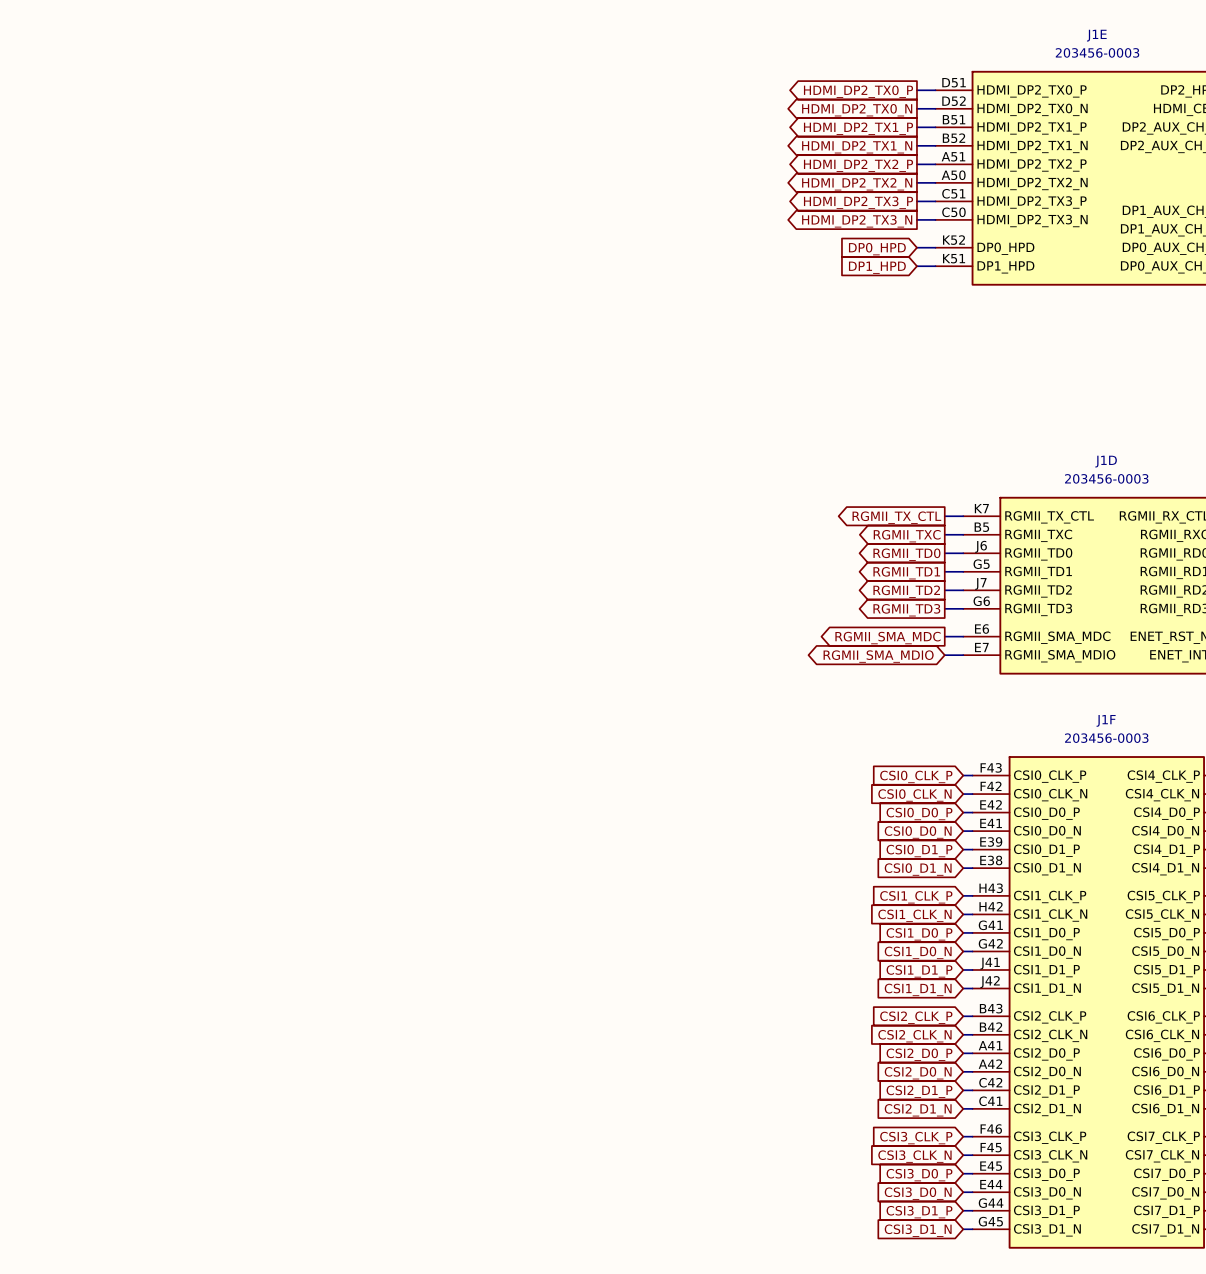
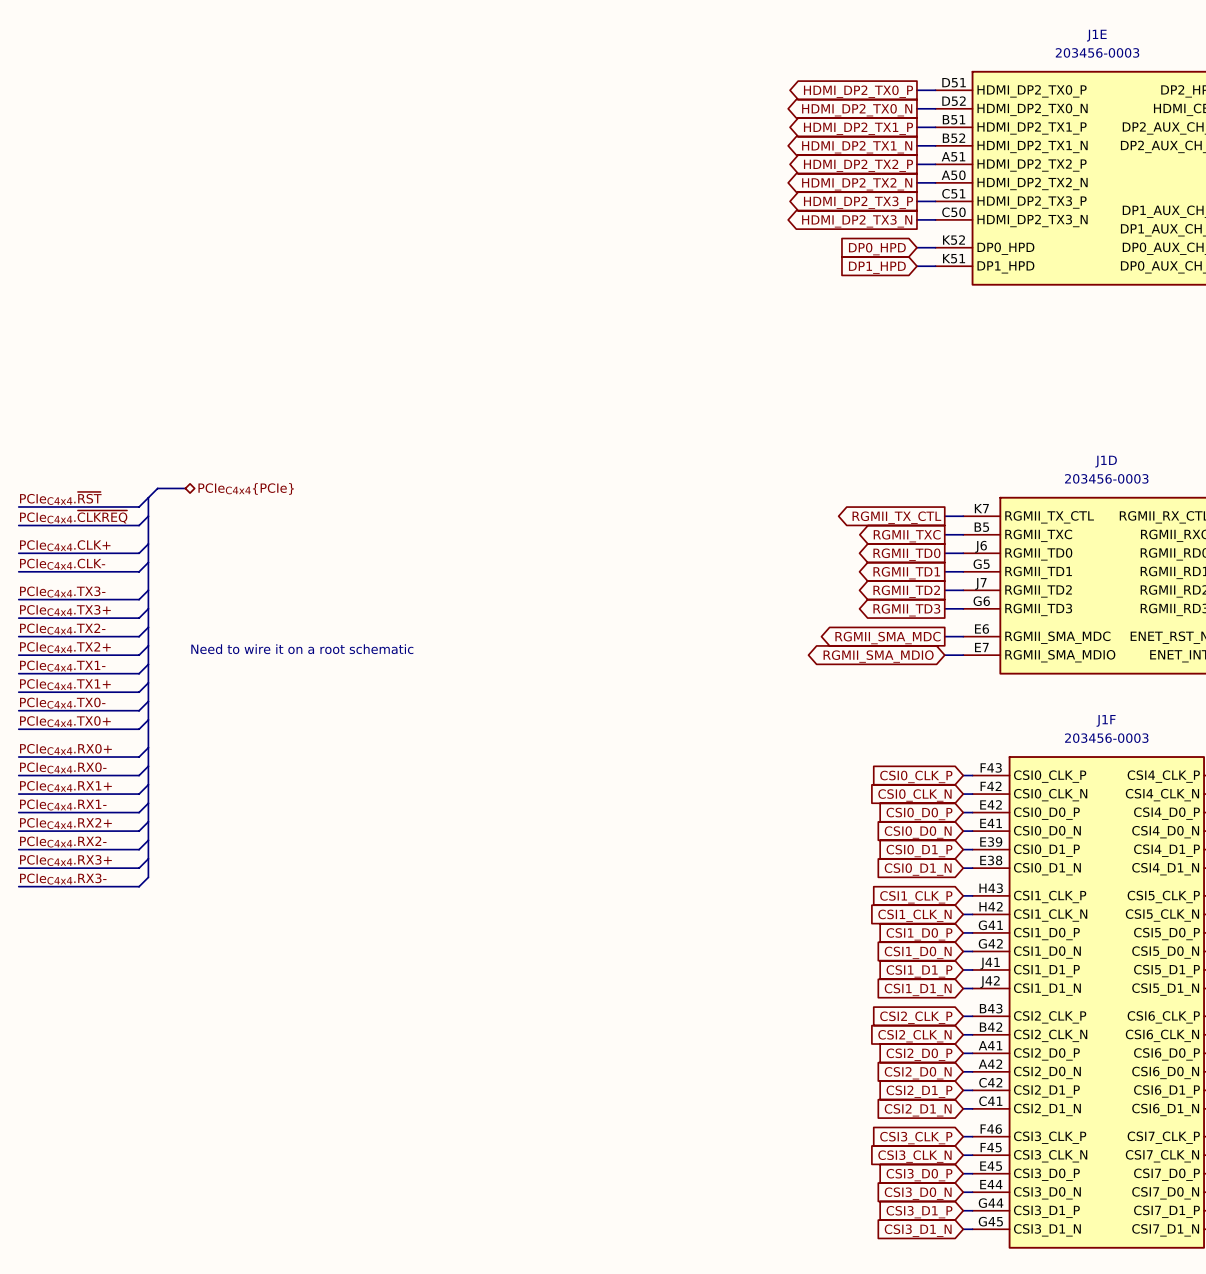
bus: none -> (185, 488) (157, 488) (148, 497) (148, 877)
hierarchical label: none -> PCIeC4x4{PCIe} (246, 488)
wire: none -> (148, 497) (139, 506) (18, 506)
label: none -> PCIeC4x4.~{RST} (60, 498)
wire: none -> (148, 516) (139, 525) (18, 525)
label: none -> PCIeC4x4.~{CLKREQ} (73, 517)
wire: none -> (148, 544) (139, 553) (18, 553)
label: none -> PCIeC4x4.CLK+ (65, 545)
wire: none -> (148, 562) (139, 571) (18, 571)
label: none -> PCIeC4x4.CLK- (62, 564)
wire: none -> (148, 590) (139, 599) (18, 599)
label: none -> PCIeC4x4.TX3- (62, 592)
wire: none -> (148, 608) (139, 618) (18, 618)
label: none -> PCIeC4x4.TX3+ (65, 610)
wire: none -> (148, 627) (139, 636) (18, 636)
label: none -> PCIeC4x4.TX2- (62, 629)
wire: none -> (148, 645) (139, 655) (18, 655)
label: none -> PCIeC4x4.TX2+ (65, 647)
text: none -> Need to wire it on a root schematic (302, 649)
wire: none -> (148, 664) (139, 673) (18, 673)
label: none -> PCIeC4x4.TX1- (62, 666)
wire: none -> (148, 682) (139, 692) (18, 692)
label: none -> PCIeC4x4.TX1+ (65, 684)
wire: none -> (148, 701) (139, 710) (18, 710)
label: none -> PCIeC4x4.TX0- (62, 703)
wire: none -> (148, 719) (139, 729) (18, 729)
label: none -> PCIeC4x4.TX0+ (65, 721)
wire: none -> (148, 747) (139, 757) (18, 757)
label: none -> PCIeC4x4.RX0+ (65, 749)
wire: none -> (148, 766) (139, 775) (18, 775)
label: none -> PCIeC4x4.RX0- (63, 767)
wire: none -> (148, 784) (139, 794) (18, 794)
label: none -> PCIeC4x4.RX1+ (65, 786)
wire: none -> (148, 803) (139, 812) (18, 812)
label: none -> PCIeC4x4.RX1- (63, 804)
wire: none -> (148, 821) (139, 831) (18, 831)
label: none -> PCIeC4x4.RX2+ (65, 823)
wire: none -> (148, 840) (139, 849) (18, 849)
label: none -> PCIeC4x4.RX2- (63, 842)
wire: none -> (148, 858) (139, 868) (18, 868)
label: none -> PCIeC4x4.RX3+ (65, 860)
wire: none -> (148, 877) (139, 886) (18, 886)
label: none -> PCIeC4x4.RX3- (63, 879)

